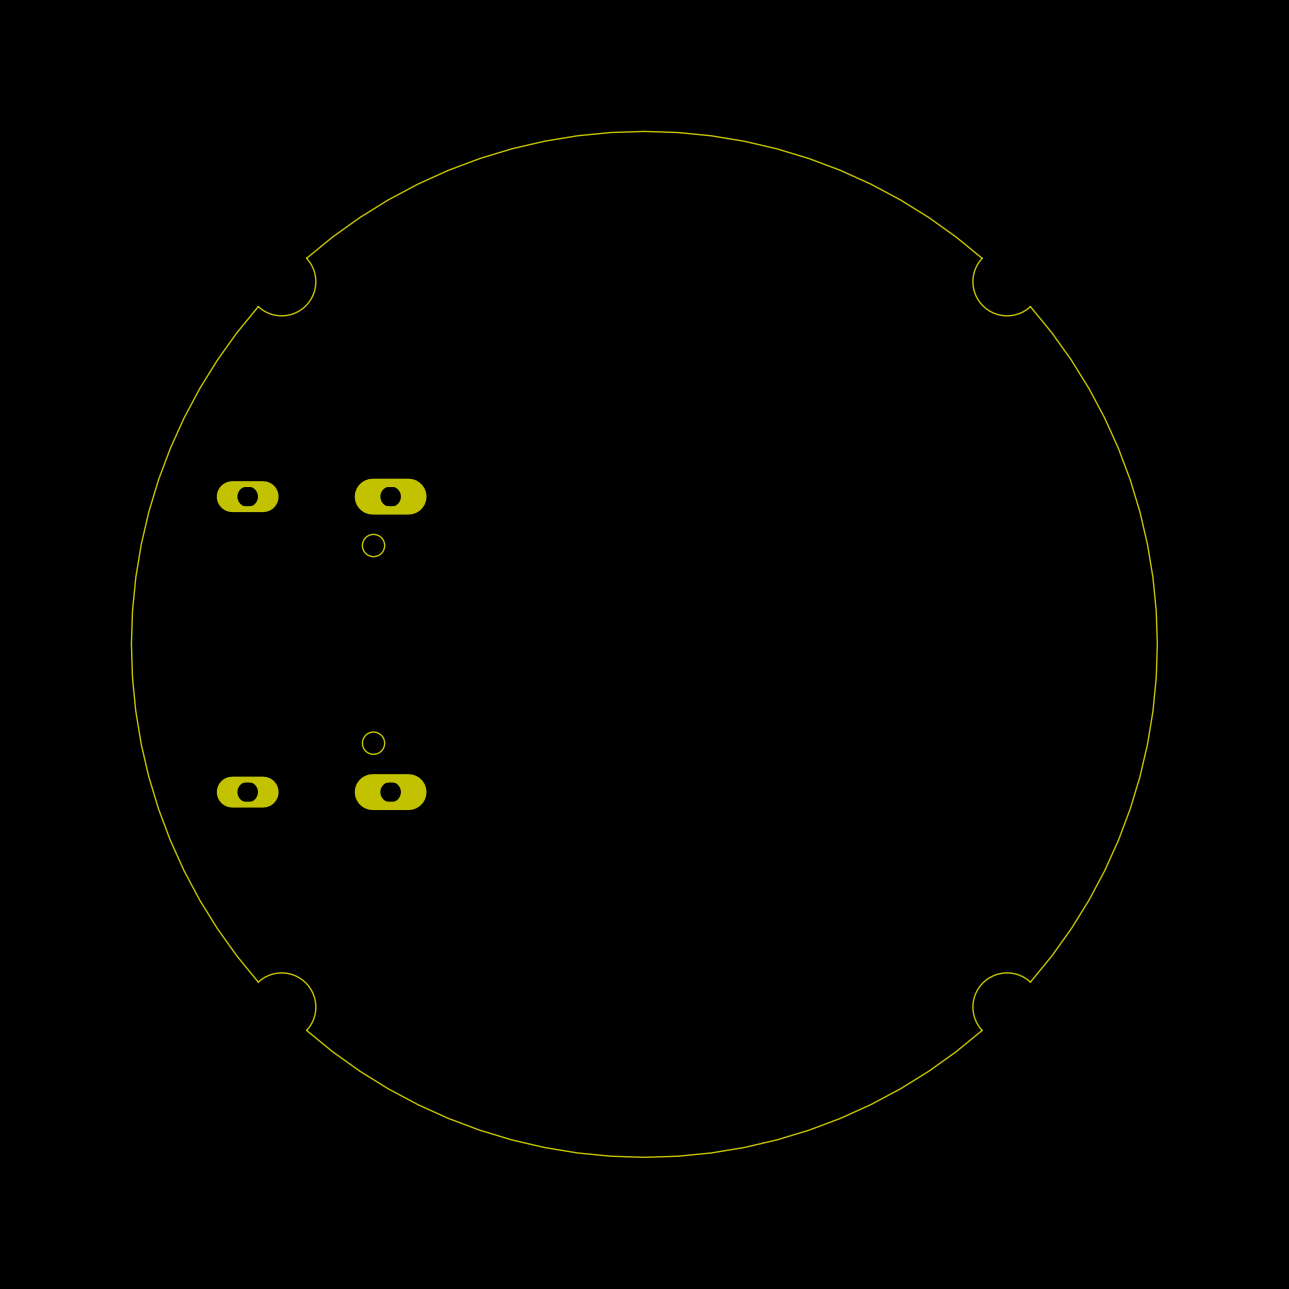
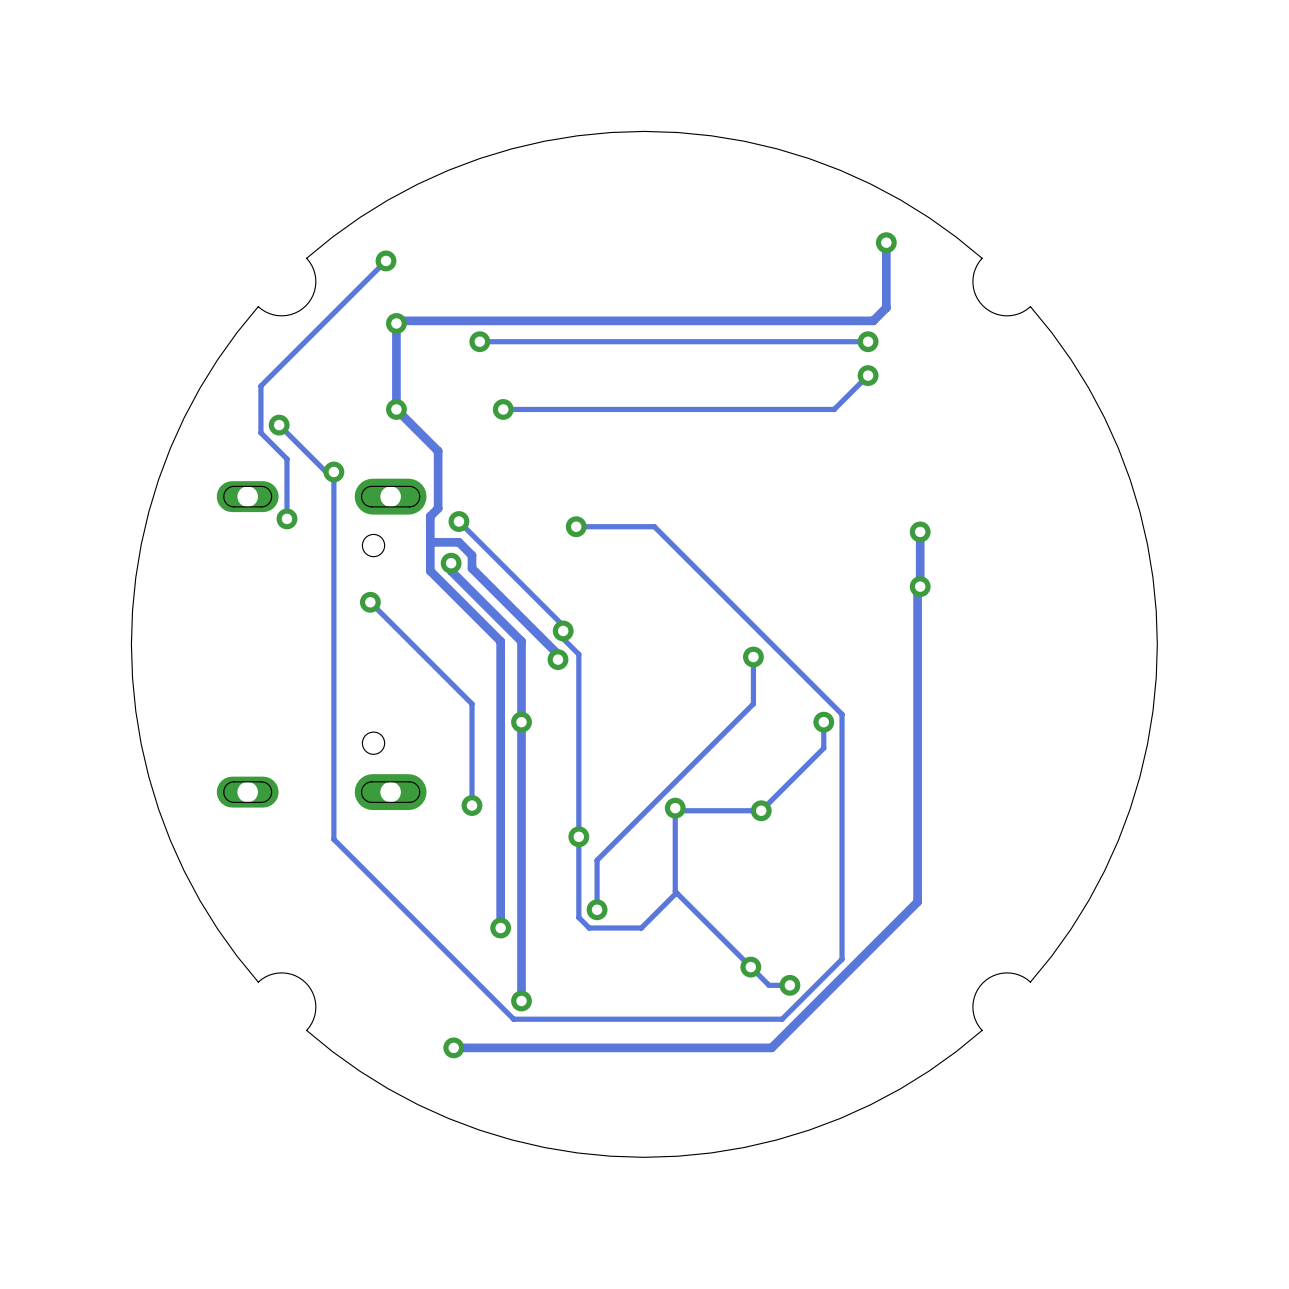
track: none -> (886, 242) (886, 307) (873, 320) (399, 320) (396, 323) (396, 409) (438, 451) (438, 508) (430, 516) (430, 571) (500, 641) (500, 928)
via: none -> (886, 242)
track: none -> (386, 260) (260, 386) (260, 432) (286, 458) (286, 518)
via: none -> (386, 260)
via: none -> (396, 323)
via: none -> (479, 341)
track: none -> (868, 341) (479, 341)
via: none -> (868, 341)
track: none -> (868, 375) (834, 409) (503, 409)
via: none -> (868, 375)
via: none -> (396, 409)
via: none -> (503, 409)
track: none -> (279, 425) (326, 472) (333, 472) (333, 839) (513, 1019) (782, 1019) (842, 959) (842, 714) (654, 526) (576, 526)
via: none -> (279, 425)
via: none -> (333, 472)
via: none -> (286, 518)
track: none -> (458, 521) (563, 625) (563, 638) (578, 654) (578, 917) (589, 928) (641, 928) (676, 892)
via: none -> (458, 521)
via: none -> (576, 526)
track: none -> (920, 531) (920, 586) (917, 589) (917, 901) (771, 1047) (453, 1047)
via: none -> (920, 531)
track: none -> (430, 542) (458, 542) (472, 555) (472, 568) (557, 654) (557, 659)
track: none -> (451, 563) (451, 571) (521, 641) (521, 1000)
via: none -> (451, 563)
via: none -> (920, 586)
track: none -> (370, 602) (472, 703) (472, 805)
via: none -> (370, 602)
via: none -> (563, 630)
track: none -> (753, 657) (753, 703) (597, 860) (597, 909)
via: none -> (753, 657)
via: none -> (557, 659)
via: none -> (521, 722)
track: none -> (823, 722) (823, 748) (761, 810) (675, 810)
via: none -> (823, 722)
via: none -> (472, 805)
track: none -> (675, 808) (675, 891) (769, 985) (789, 985)
via: none -> (675, 808)
via: none -> (761, 810)
via: none -> (578, 836)
via: none -> (597, 909)
via: none -> (500, 928)
via: none -> (750, 967)
via: none -> (789, 985)
via: none -> (521, 1000)
via: none -> (453, 1047)

